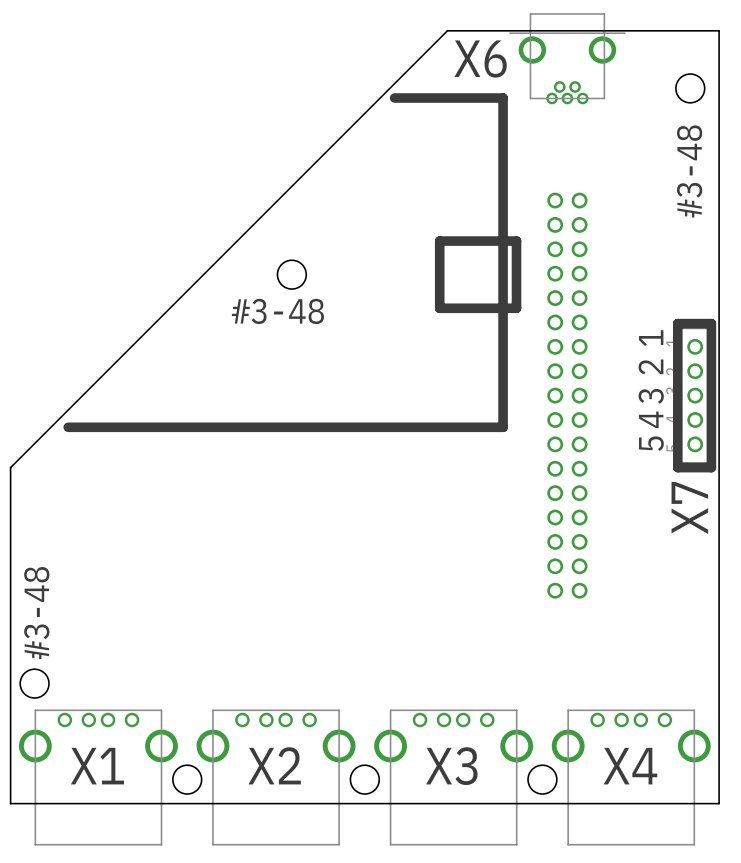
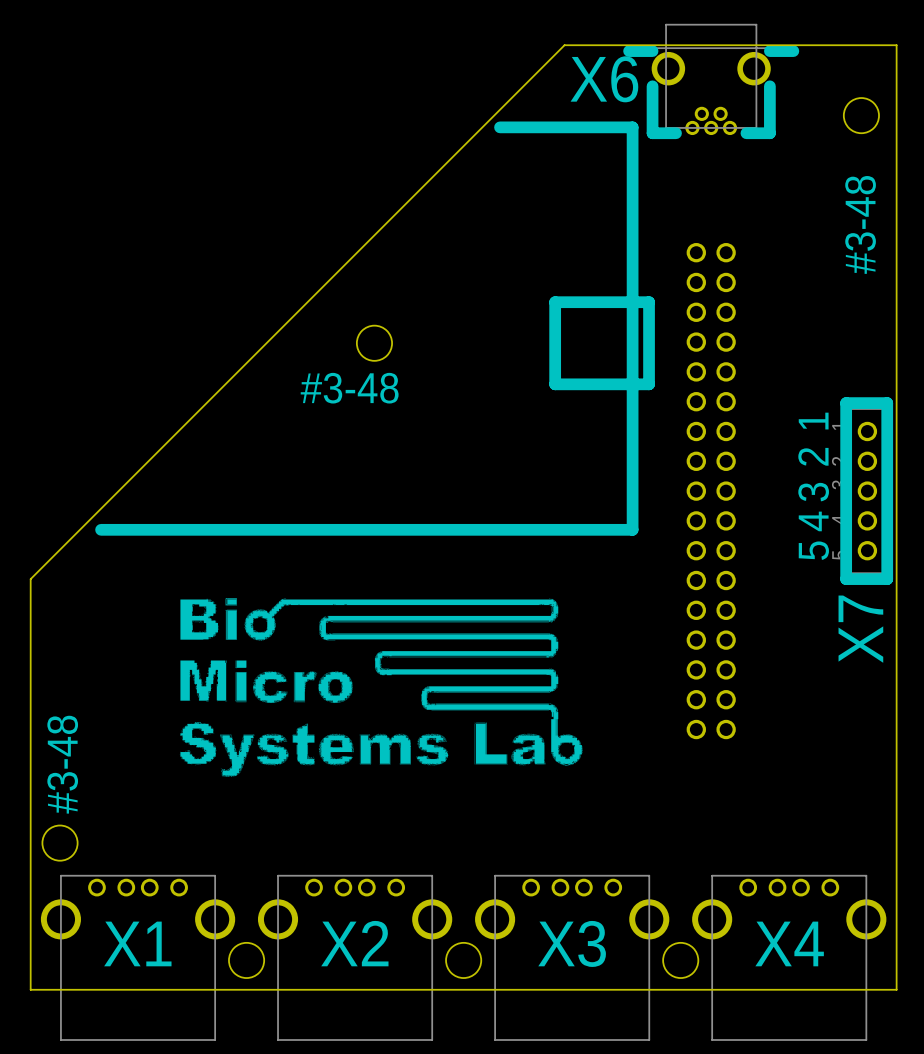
line: none -> (629, 51) (652, 51)
line: none -> (769, 51) (793, 51)
line: none -> (652, 86) (652, 133) (676, 133)
line: none -> (769, 86) (769, 133) (746, 133)
drawing: none -> [180, 598, 583, 766]
drawing: none -> [180, 660, 353, 704]
drawing: none -> [179, 722, 449, 777]

